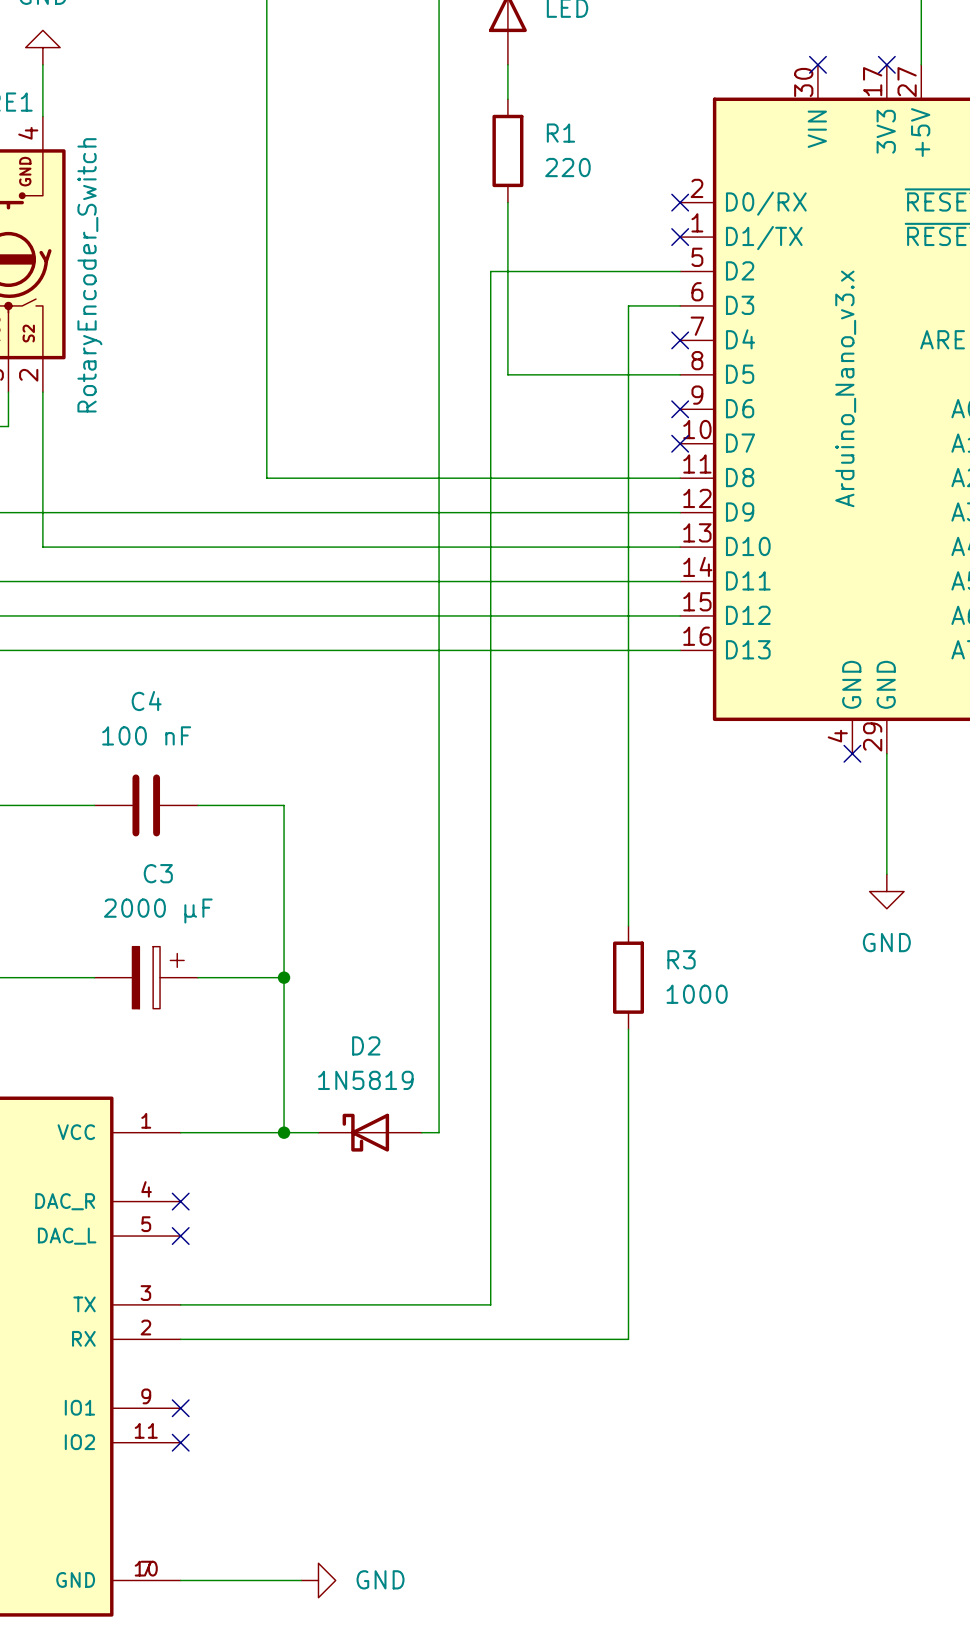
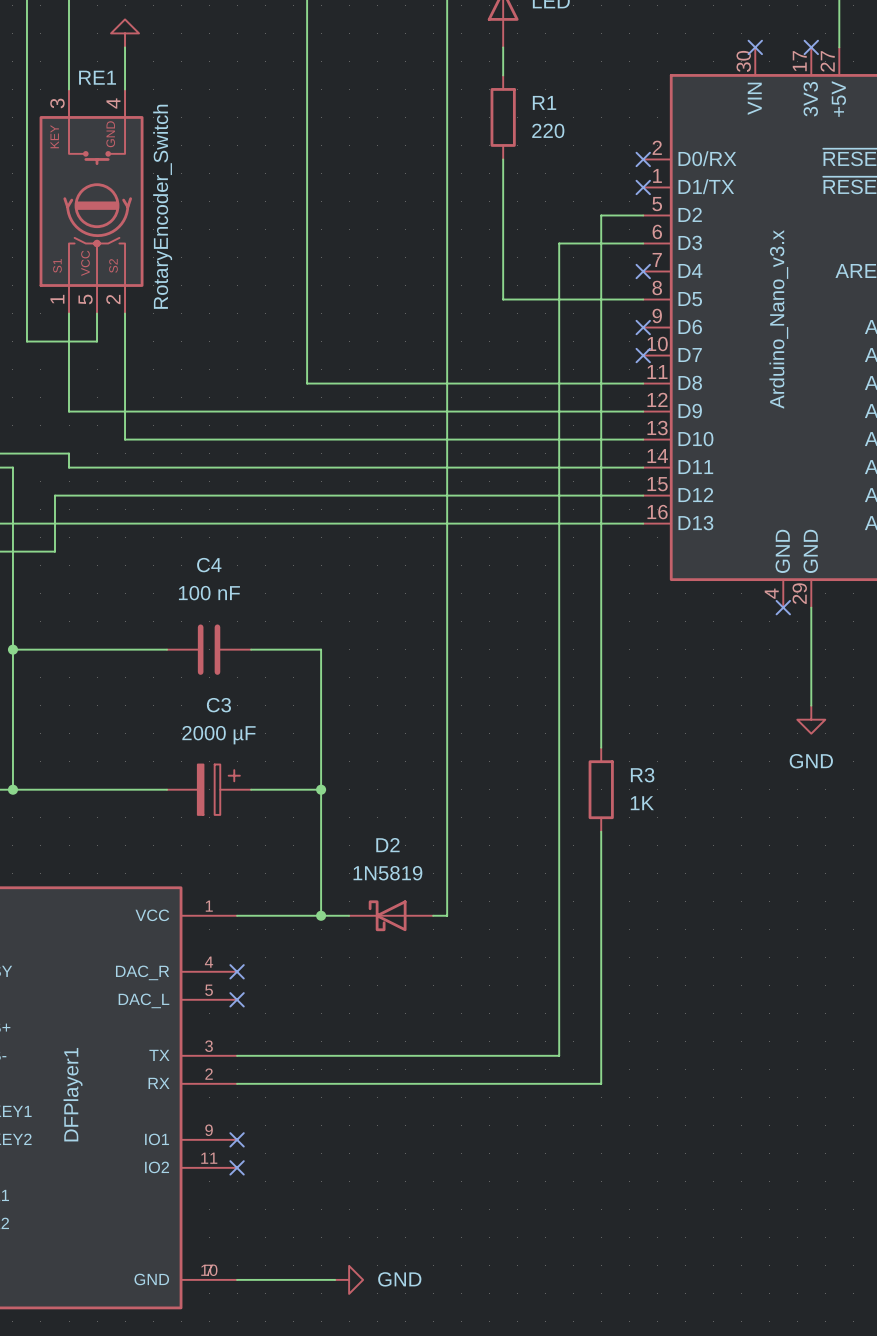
wire: (628, 271) (490, 271) (490, 1304) -> (601, 215) (601, 243) (559, 243) (559, 1055) (489, 1055)
R3 value: 1000 (697, 994) -> 1K (642, 803)

